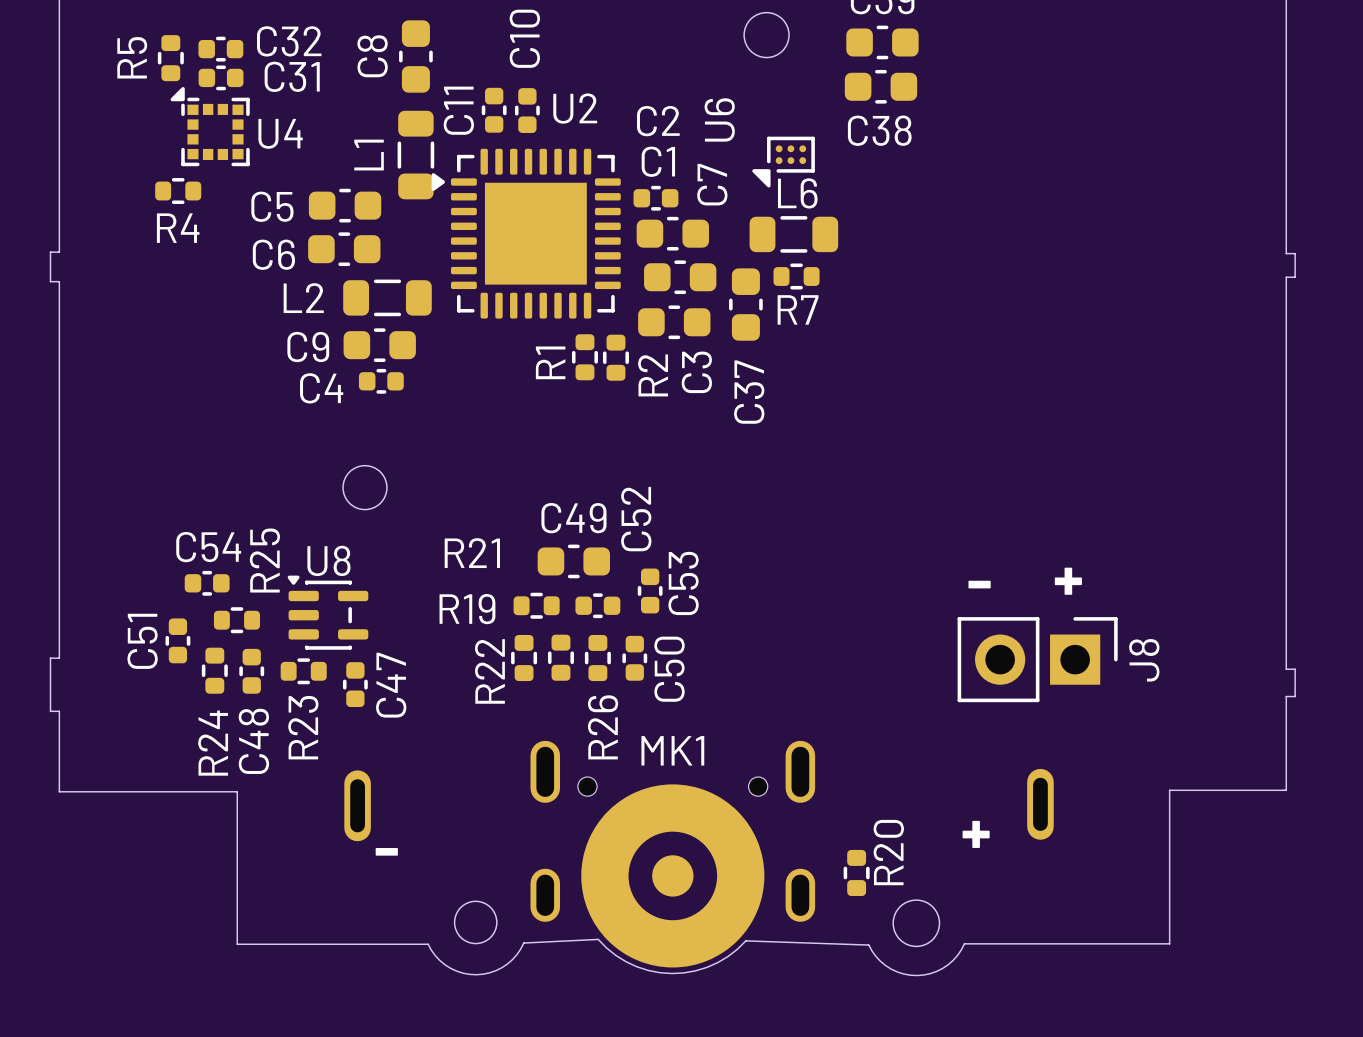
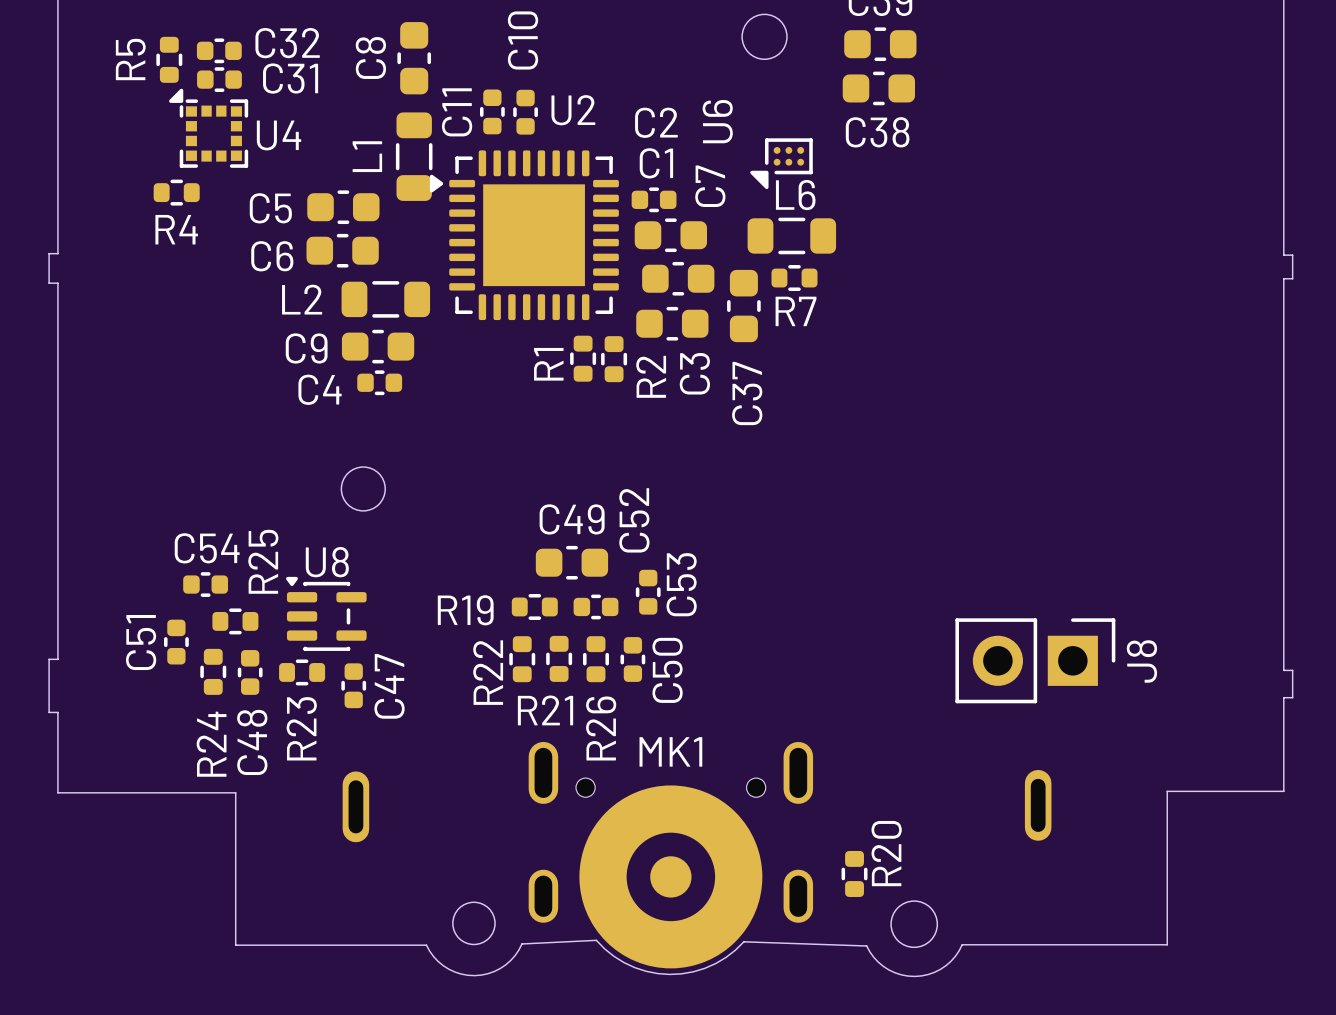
R21 name position: R21 (472, 553) -> R21 (545, 710)
text: + (1068, 581) -> none
text: - (979, 584) -> none
text: + (976, 834) -> none
text: - (386, 851) -> none

